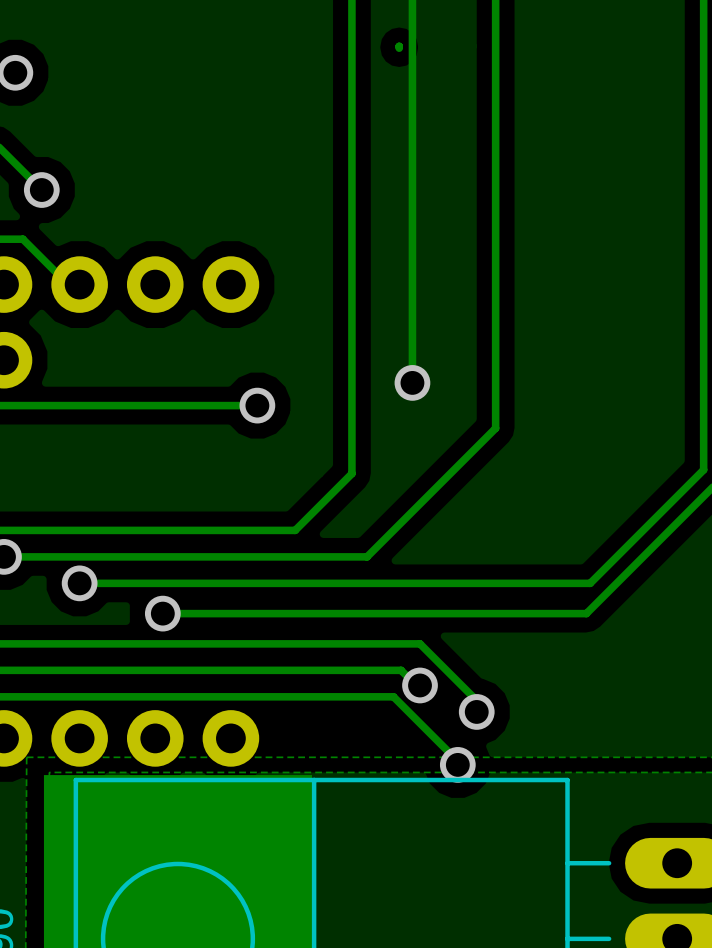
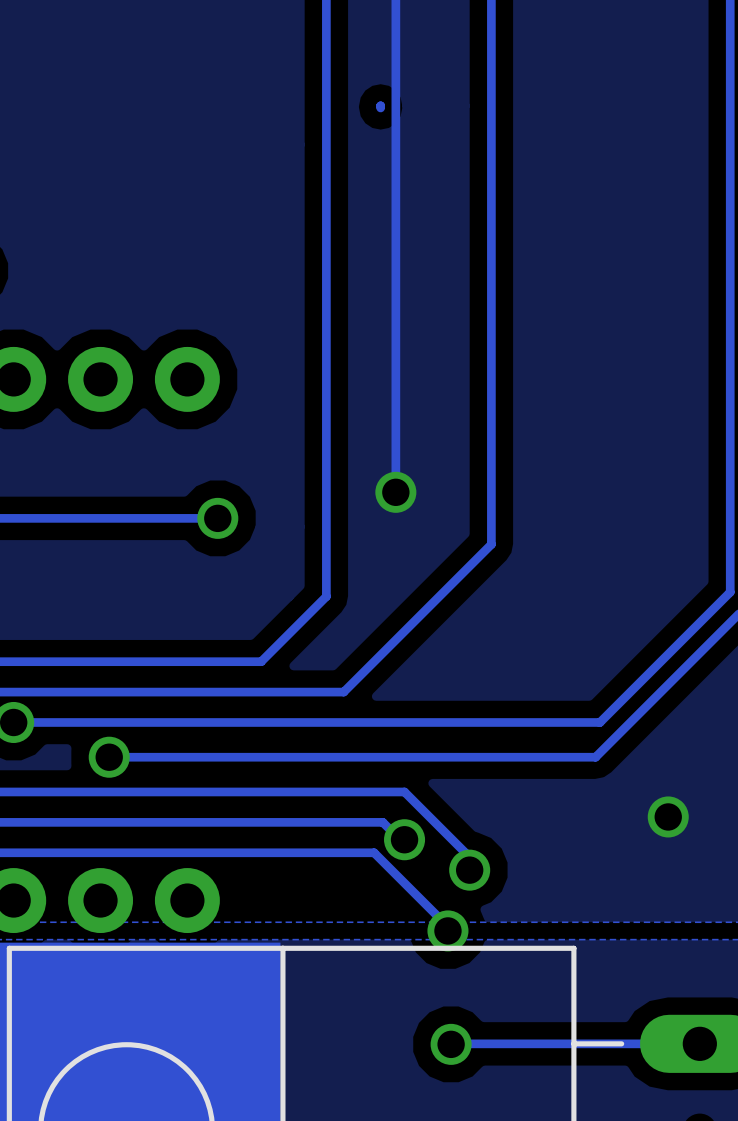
via: none -> (668, 816)
via: none -> (451, 1044)
track: none -> (699, 1043) (451, 1044)

